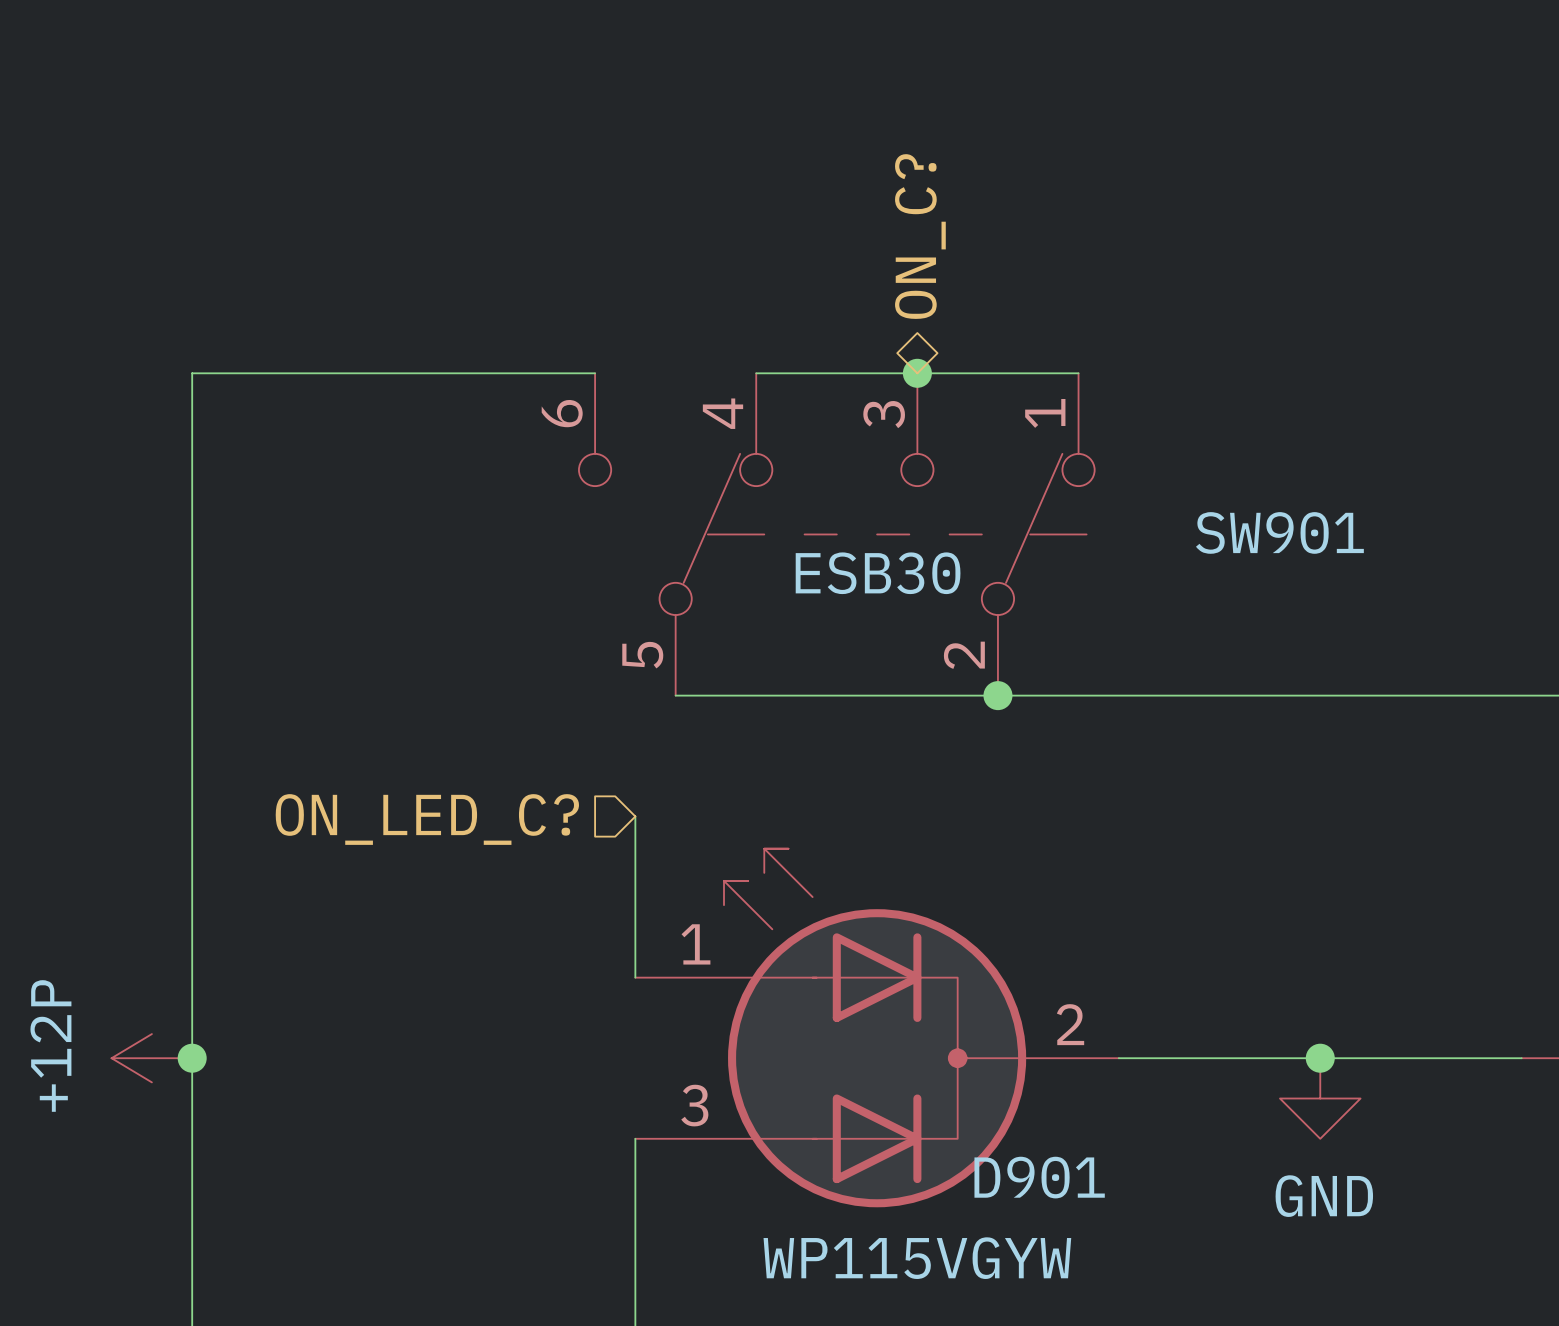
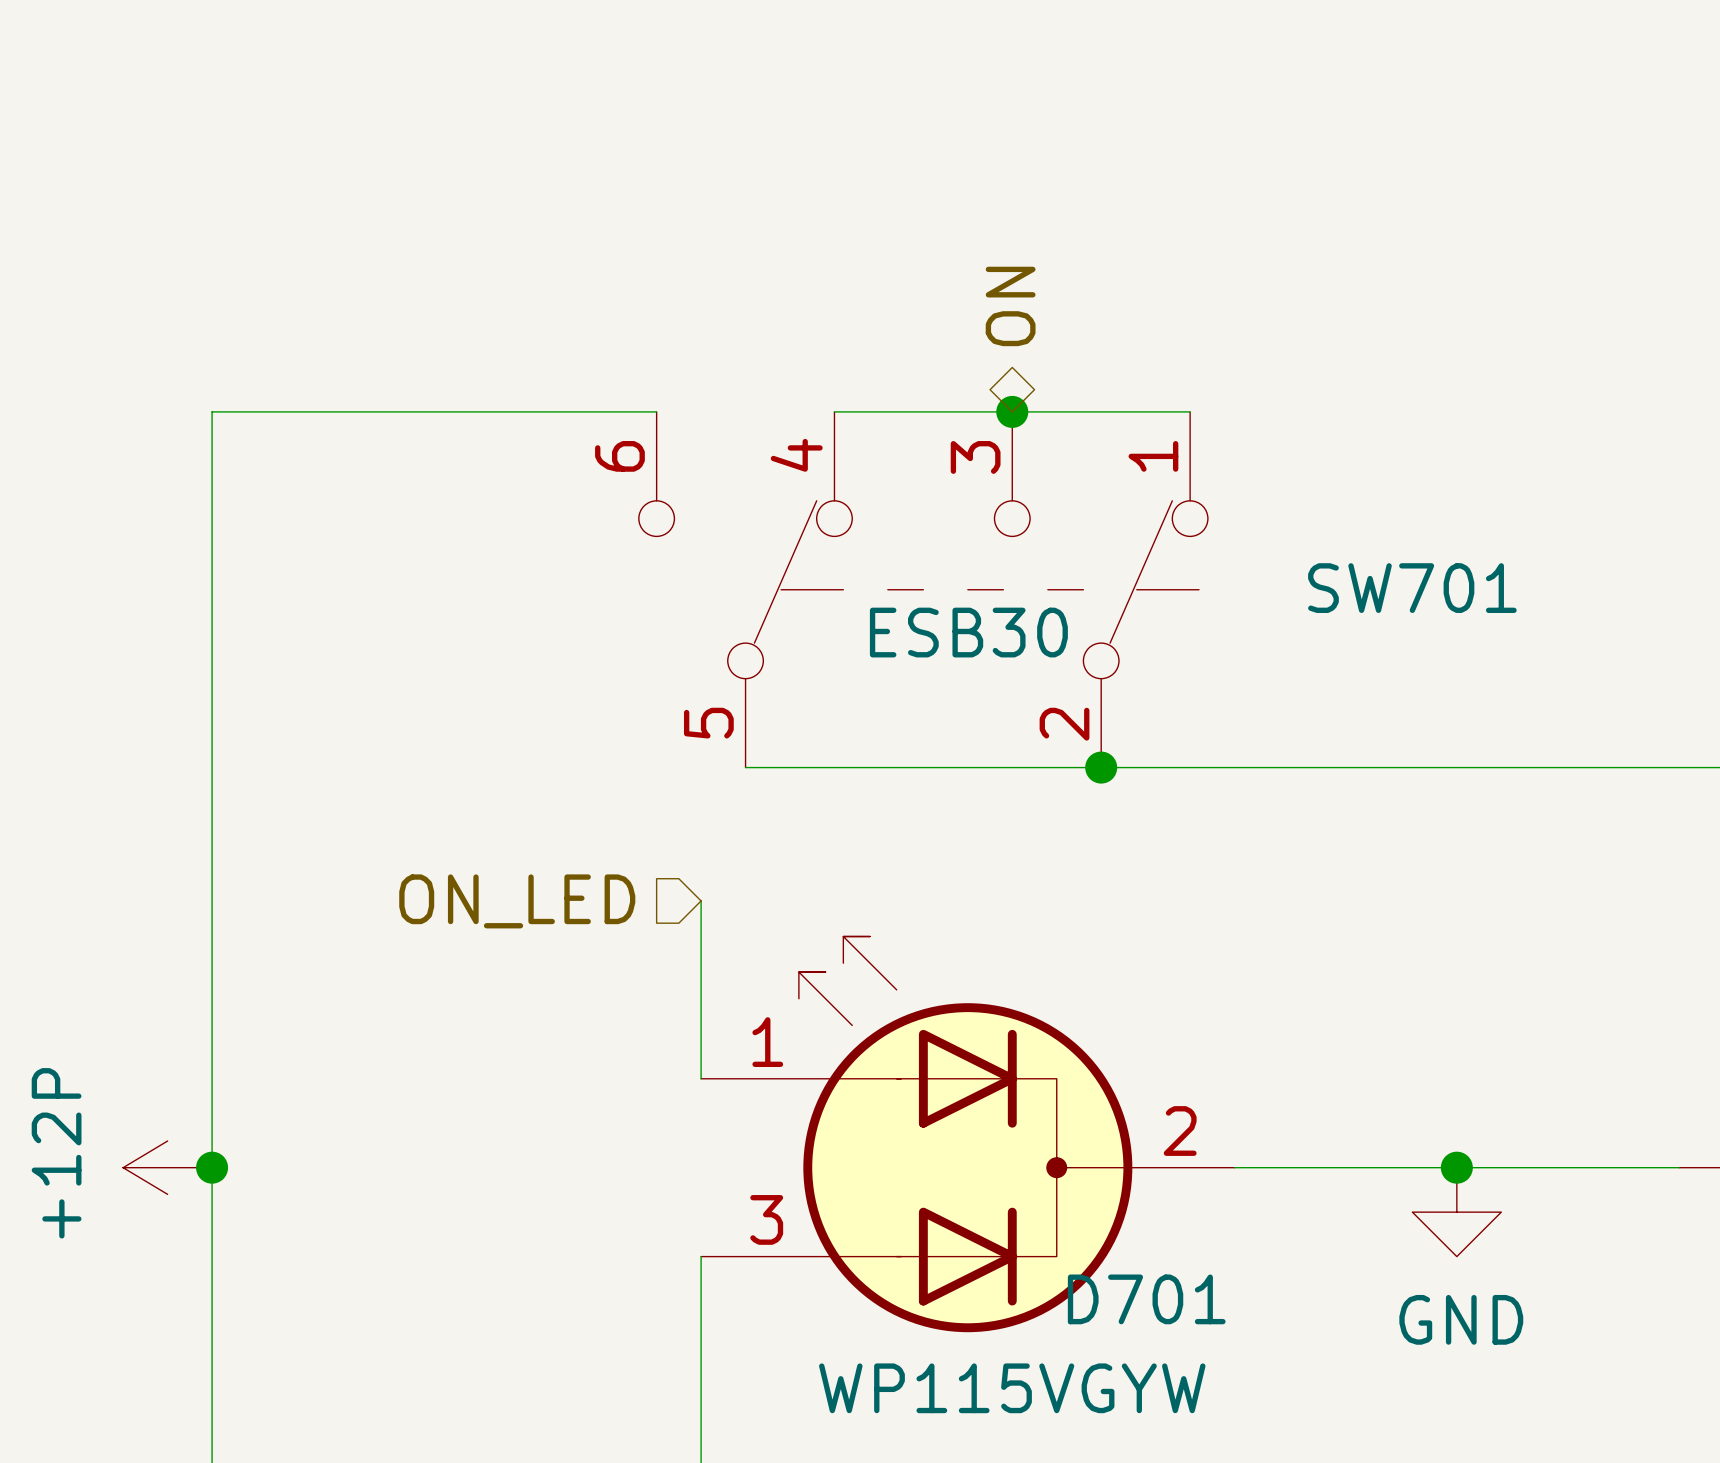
hierarchical label: ON_C? (920, 236) -> ON (1010, 306)
SW901 name: SW901 (1279, 532) -> SW701 (1412, 588)
hierarchical label: ON_LED_C? (427, 819) -> ON_LED (517, 901)
D901 name: D901 (1039, 1177) -> D701 (1146, 1299)

